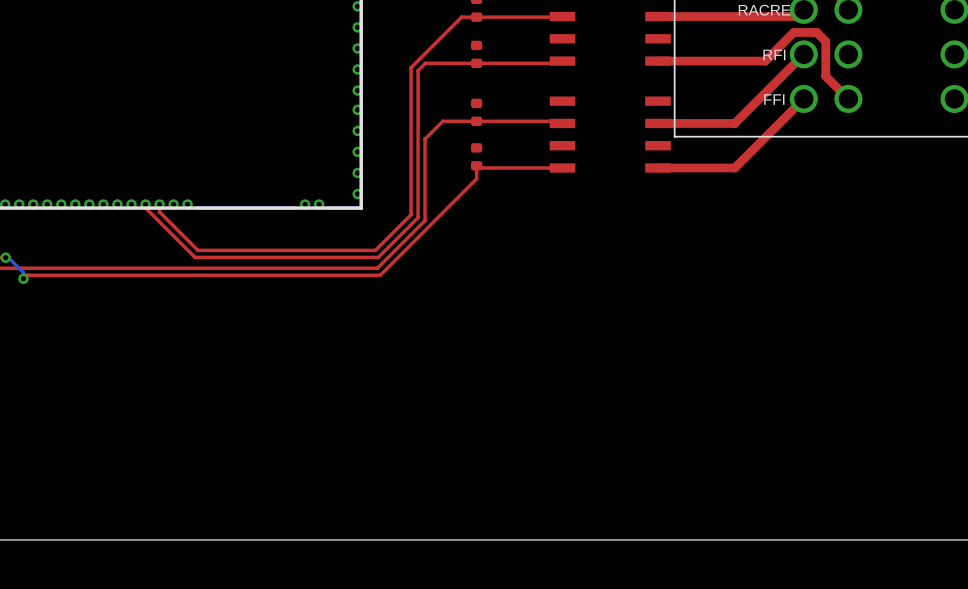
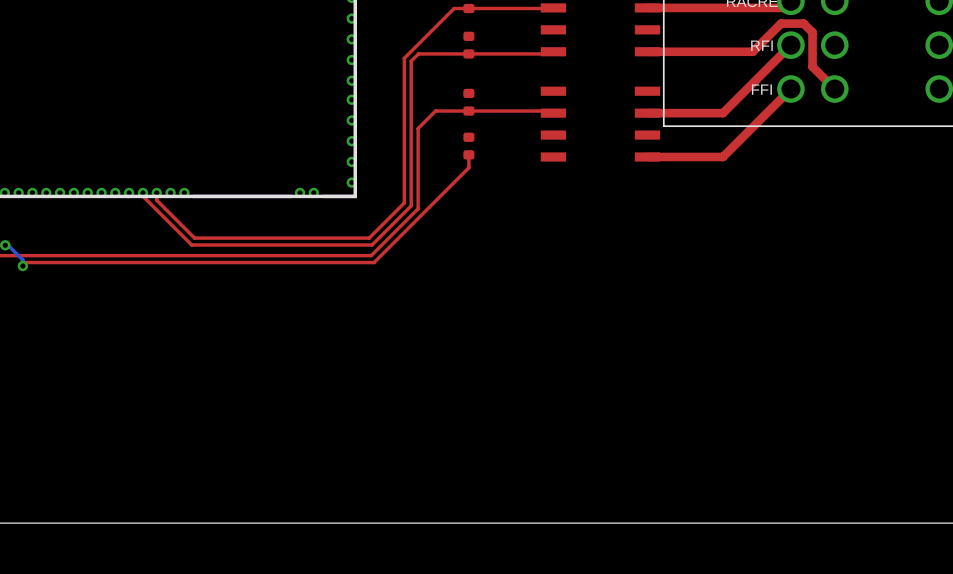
top track: (476, 165) (478, 167) (562, 167) -> none

